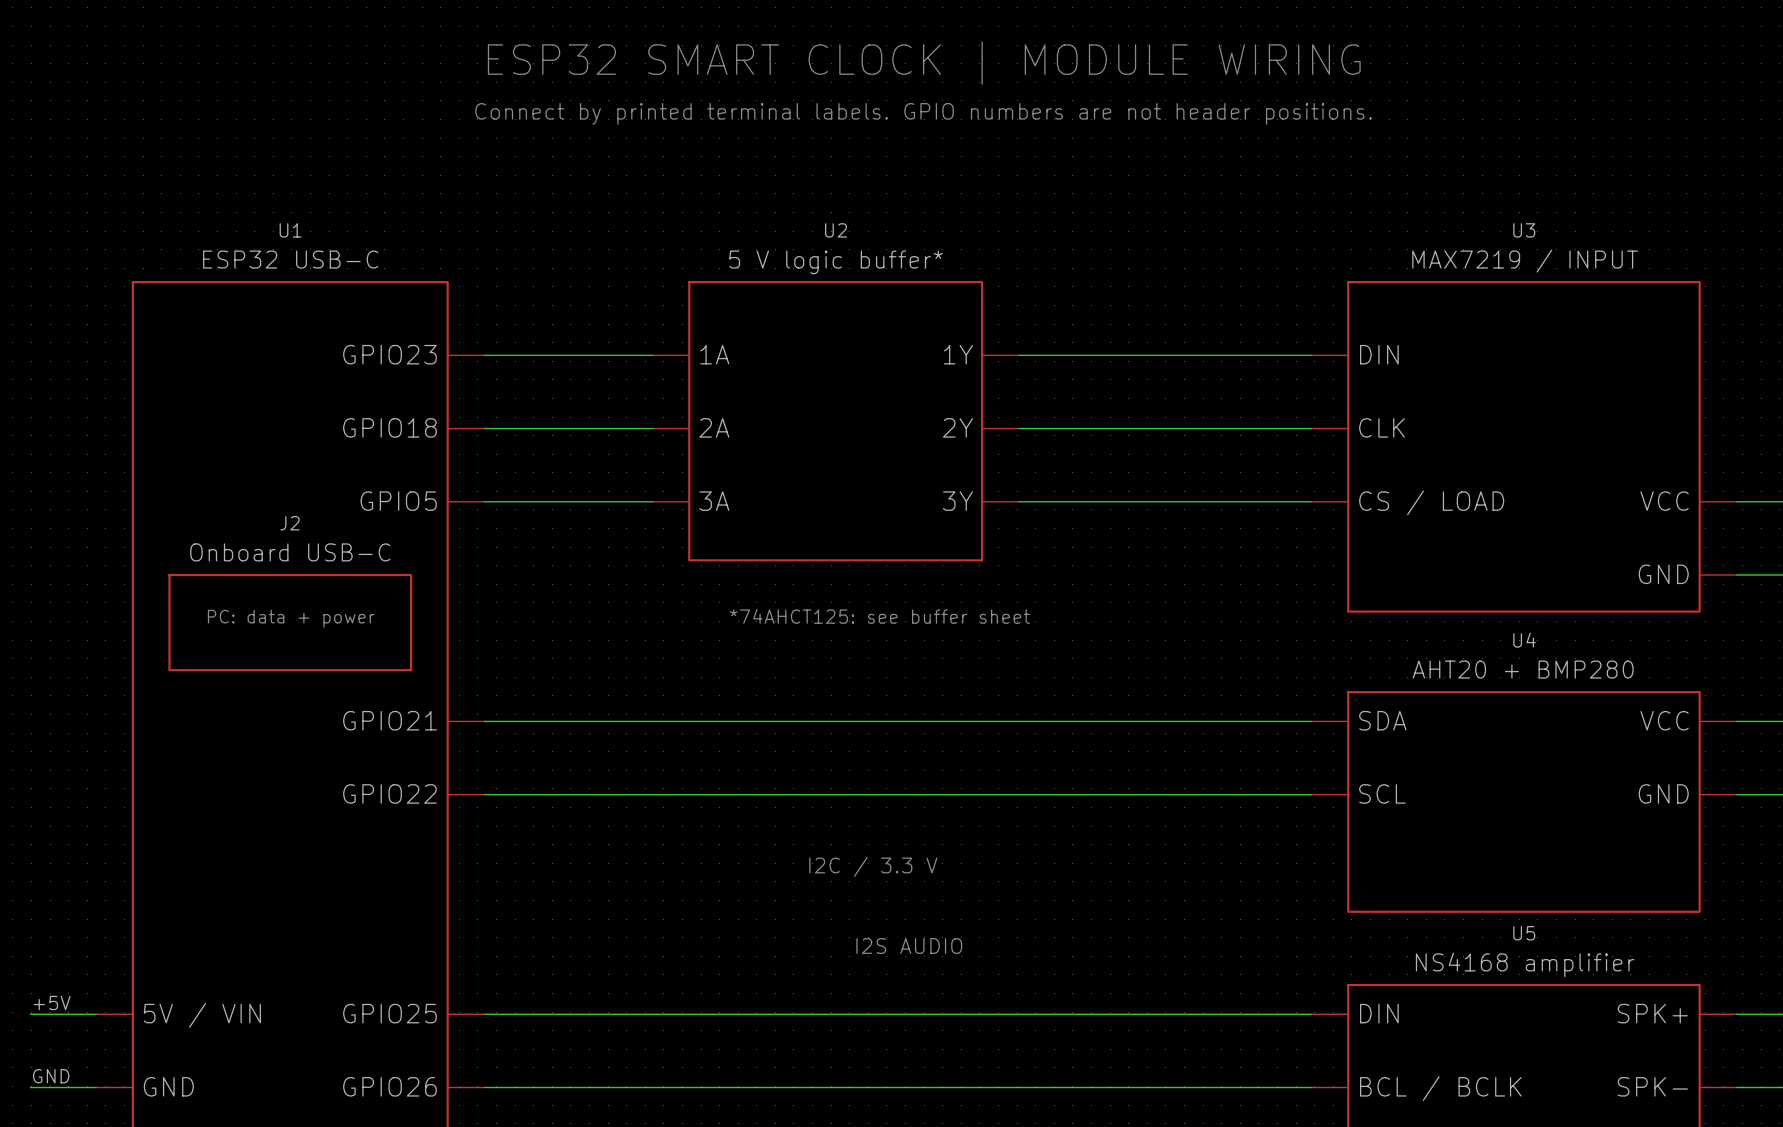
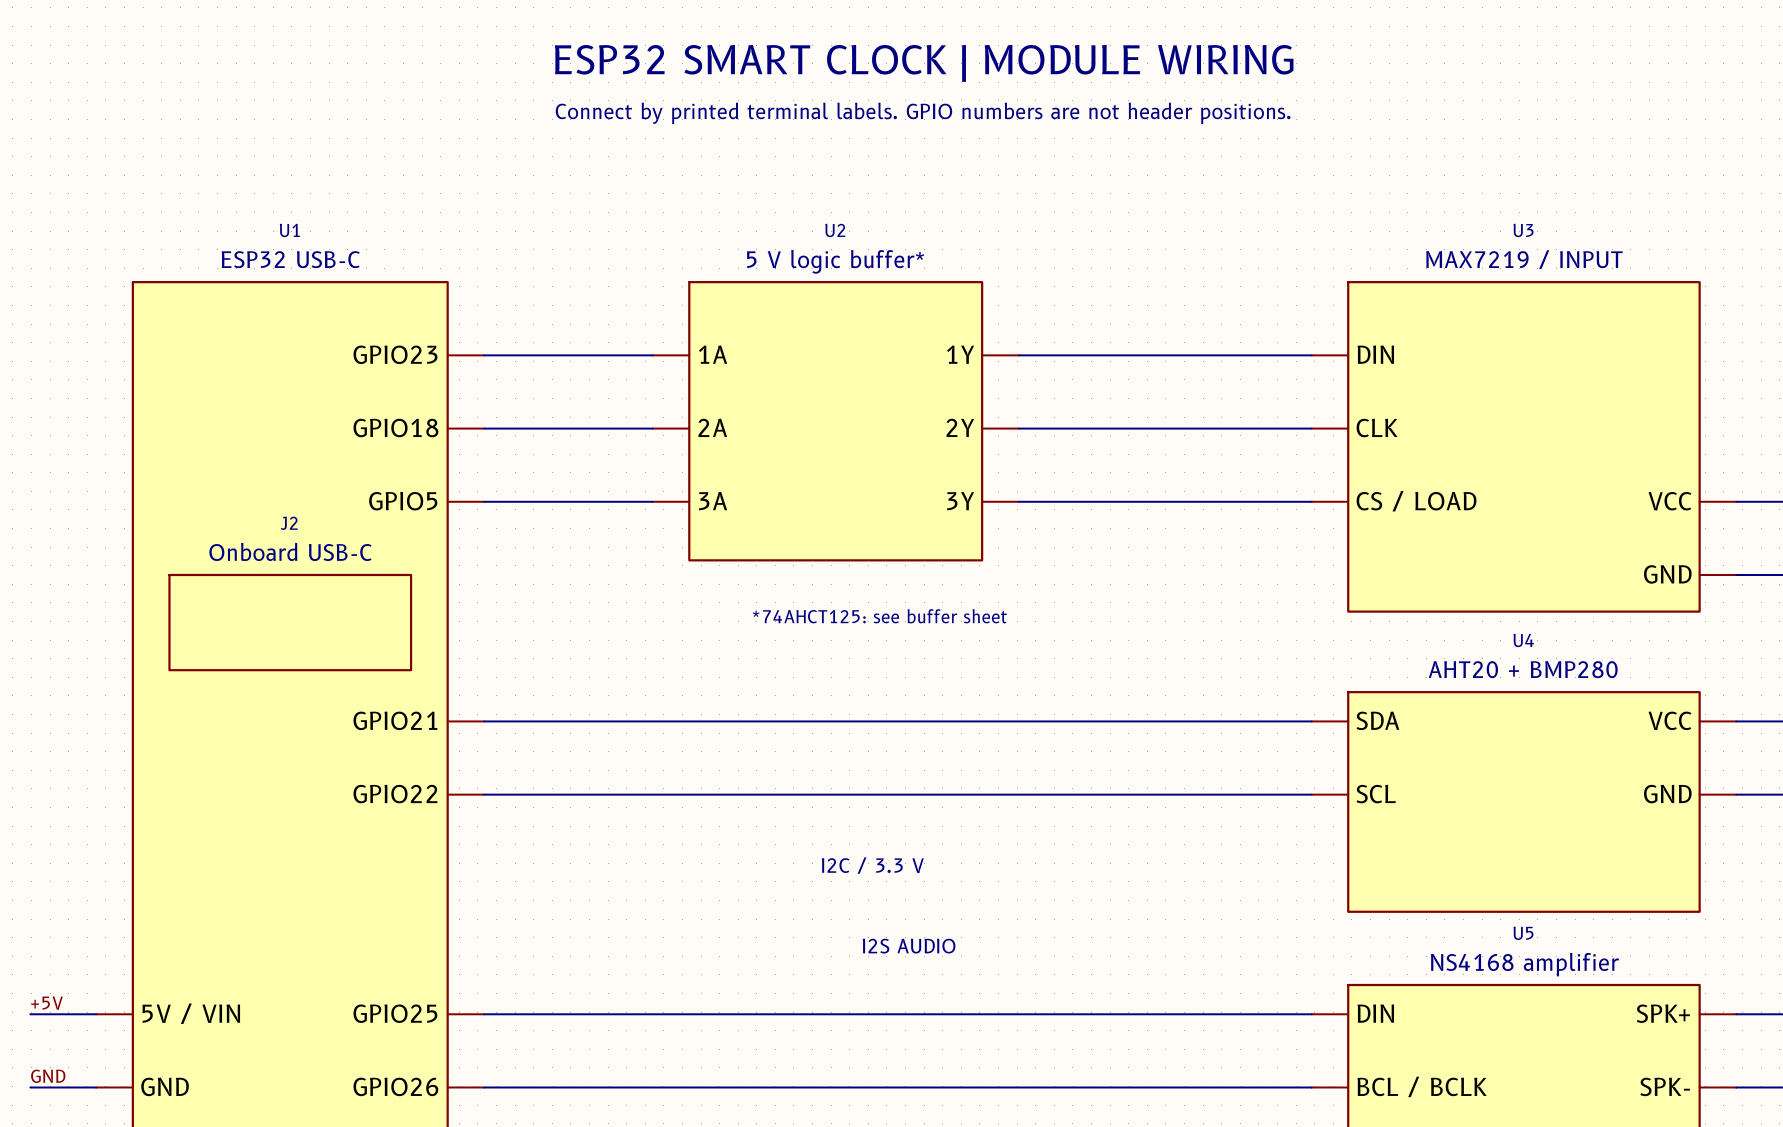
text: PC: data + power (291, 618) -> none

